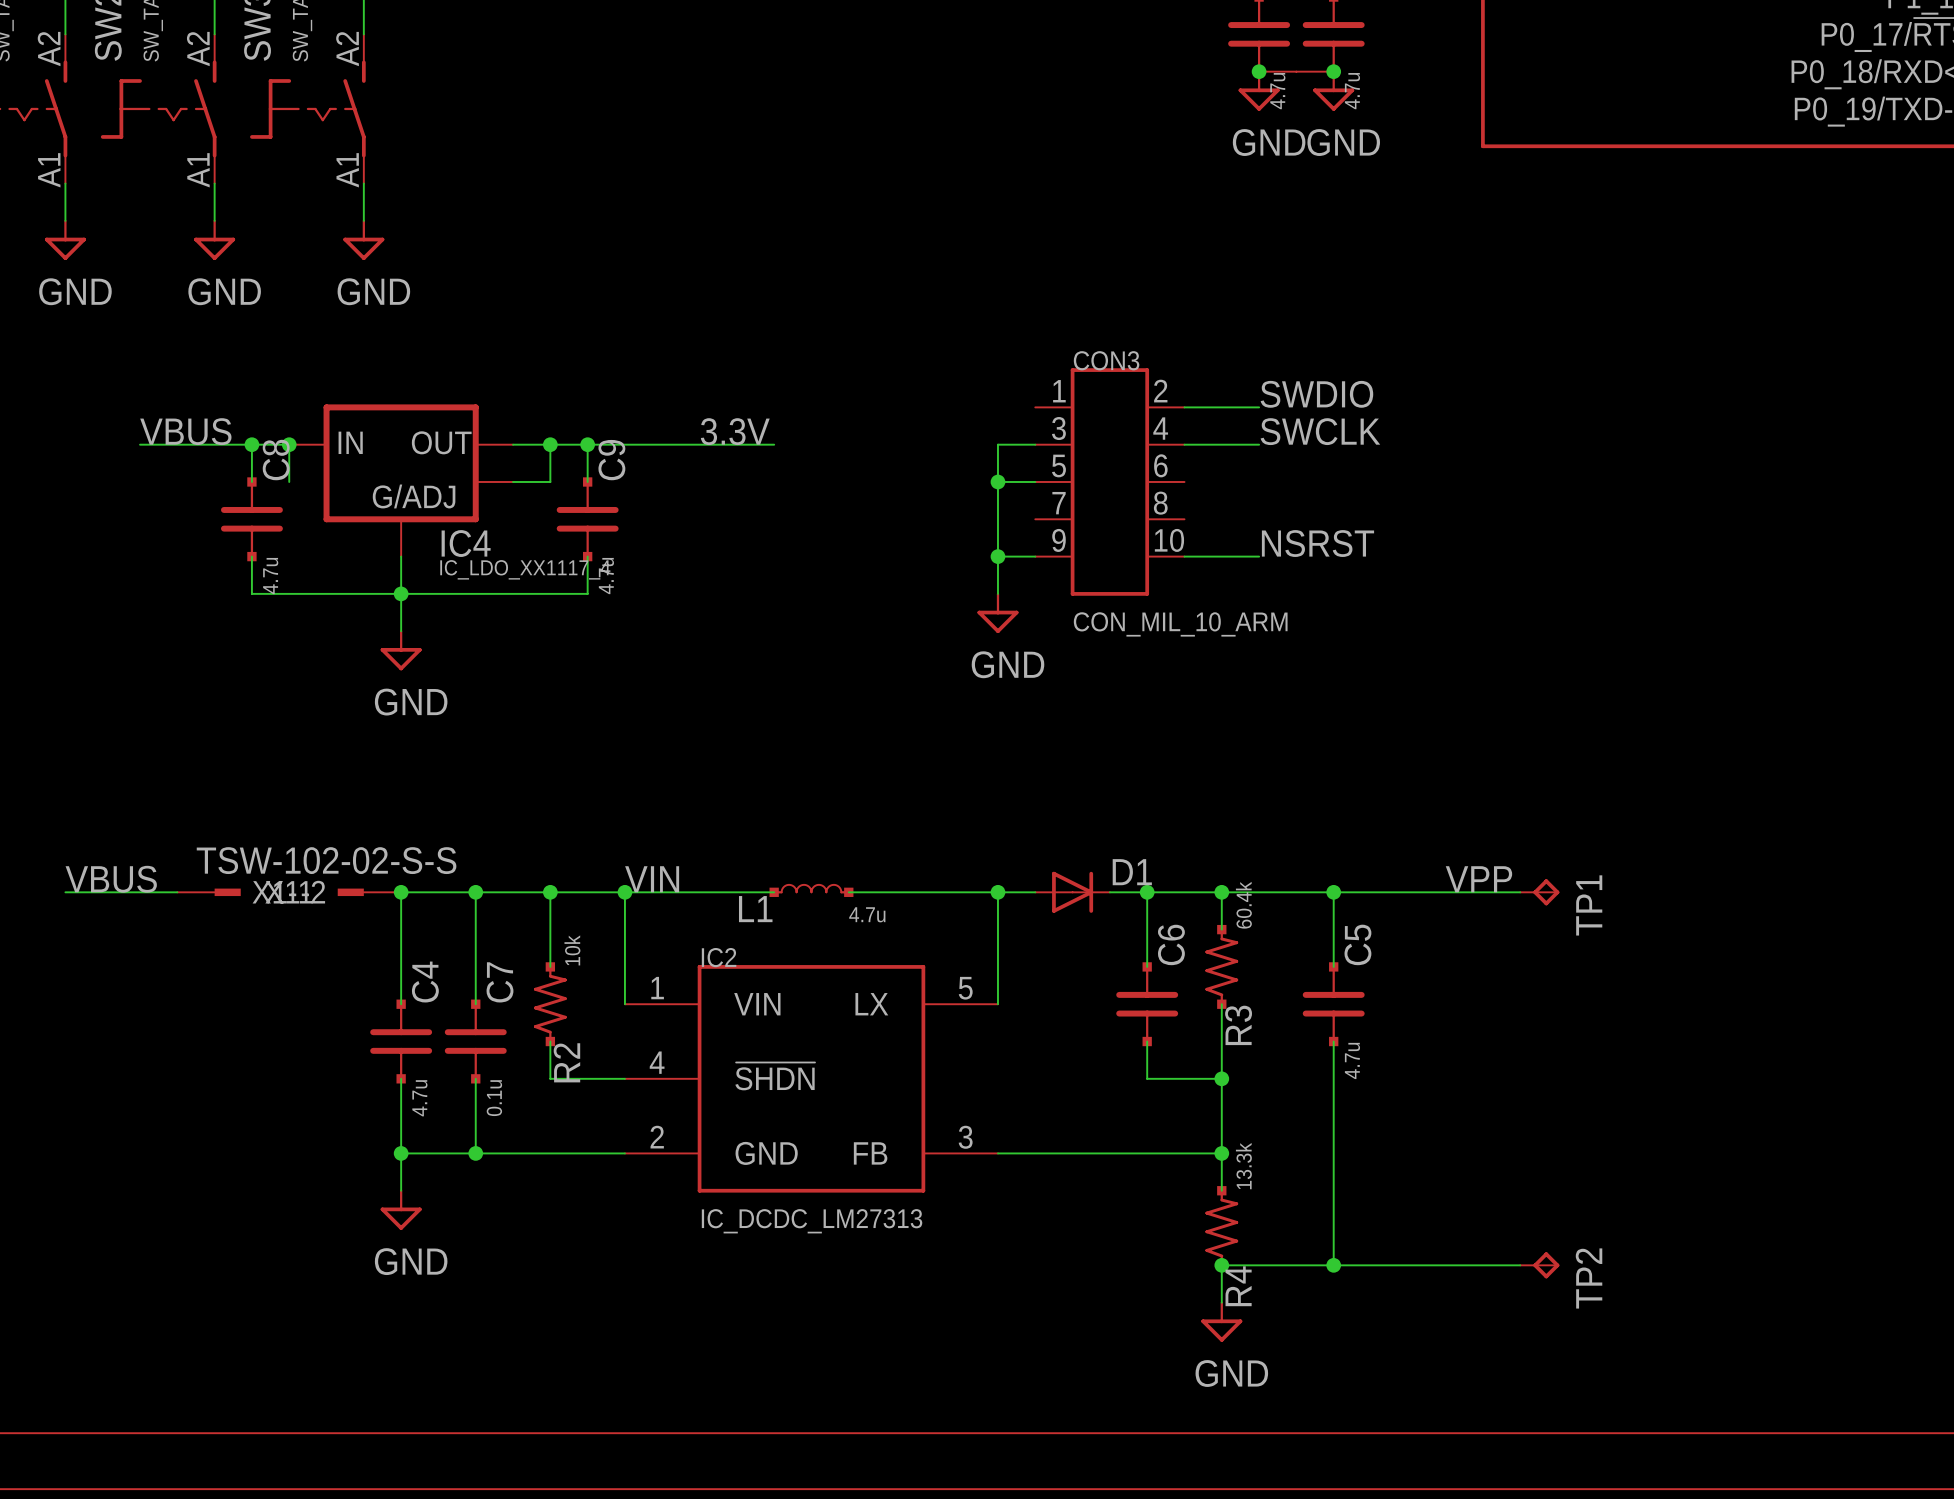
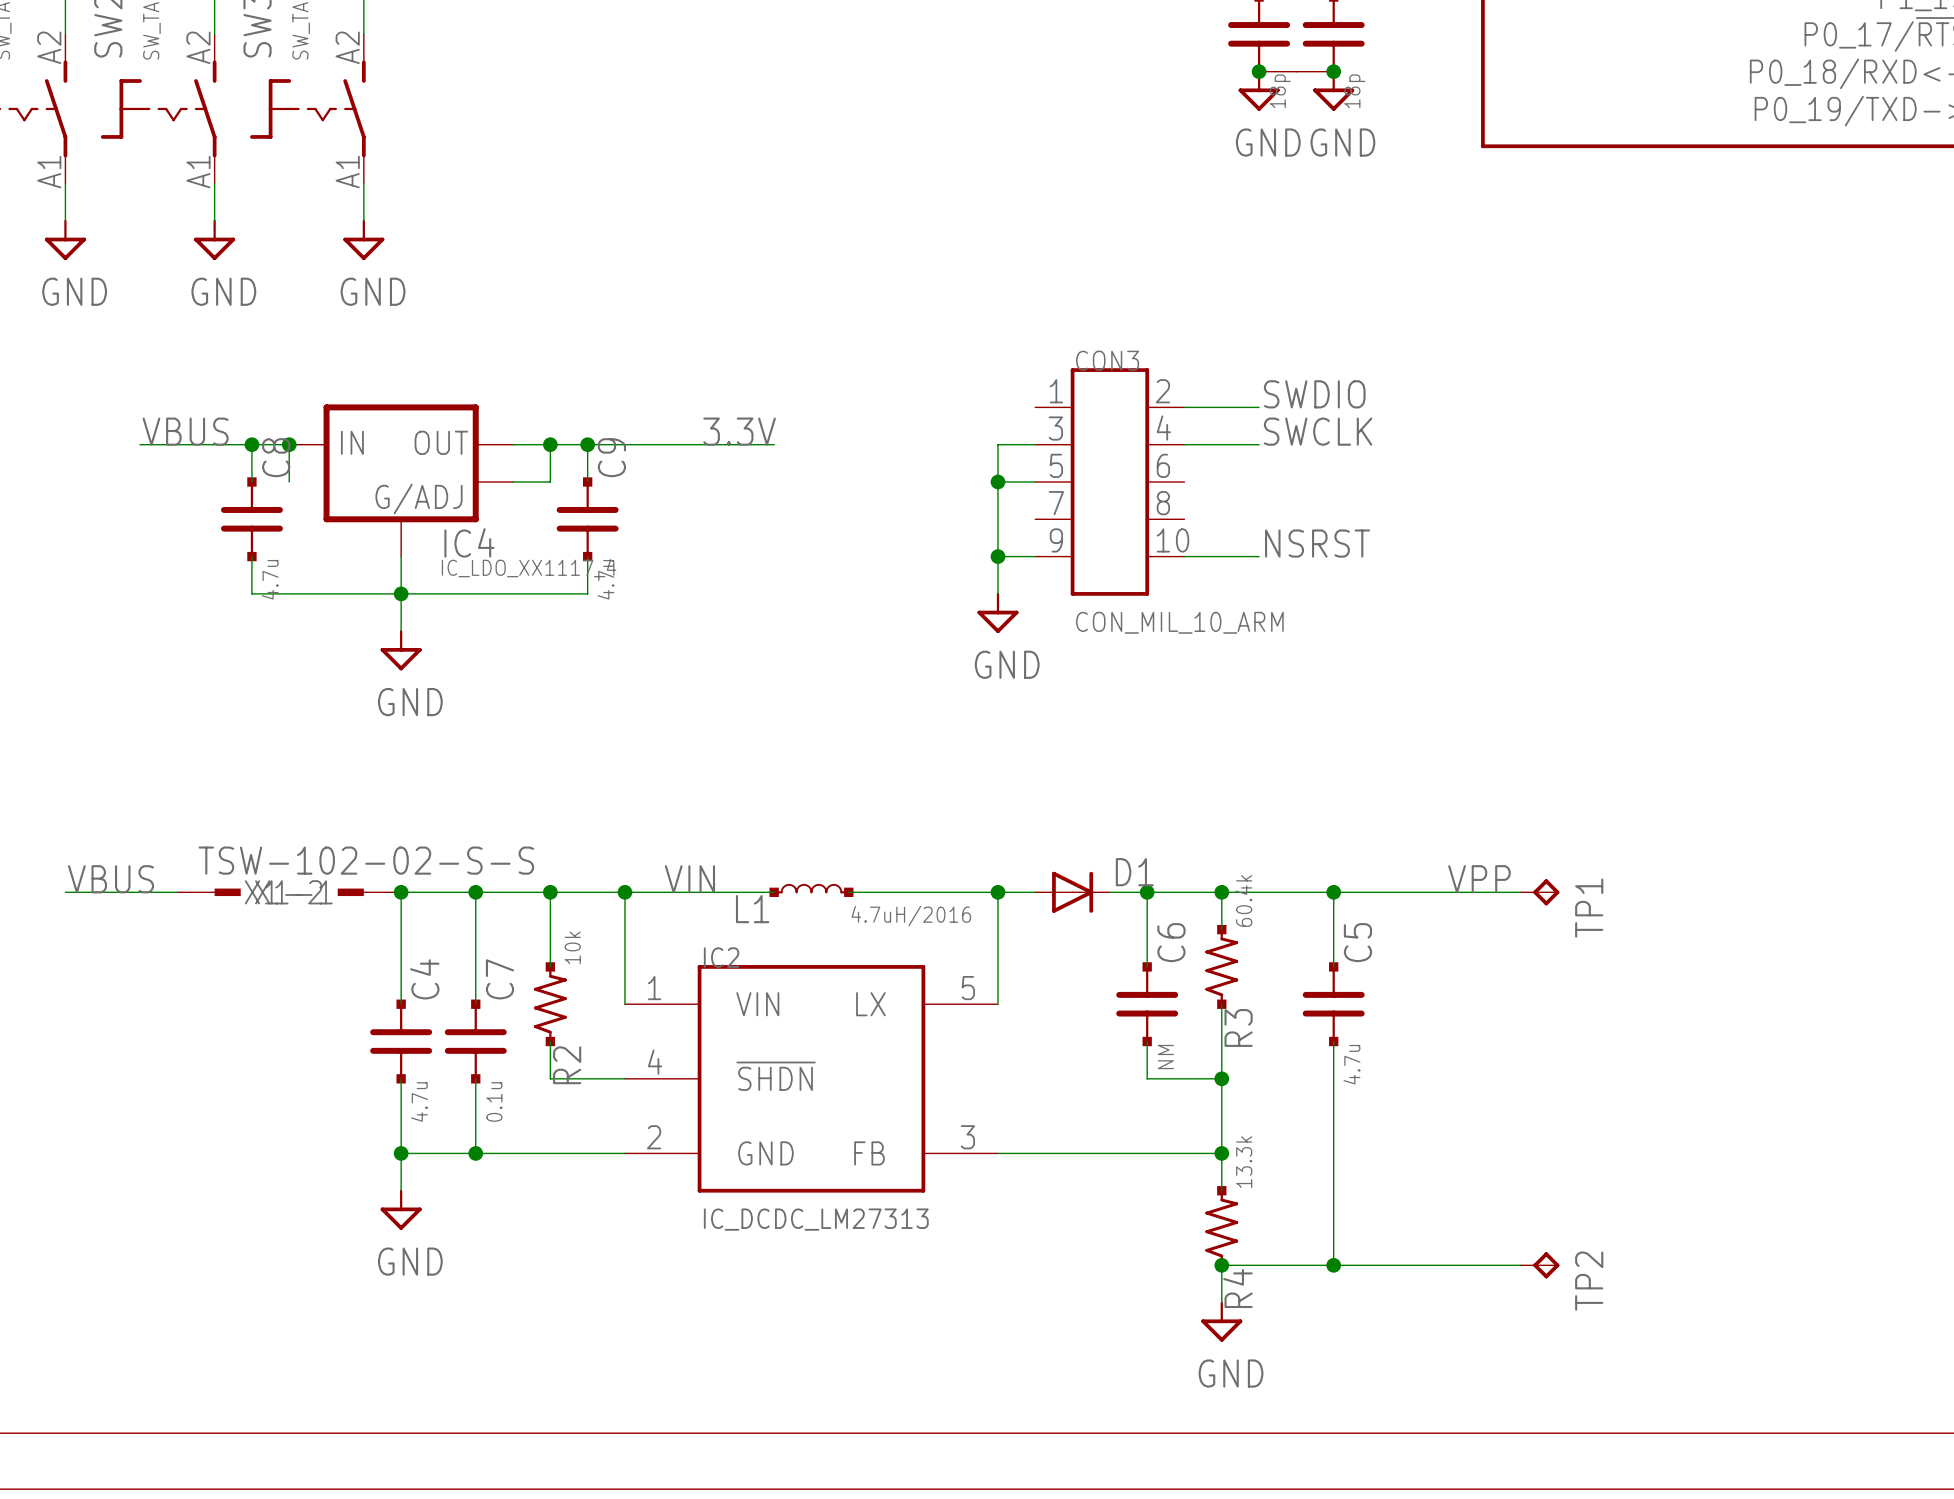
part value: 4.7u (1277, 91) -> 18p (1280, 91)
part value: 4.7u (1352, 91) -> 18p (1354, 91)
label position: VIN (652, 879) -> VIN (689, 879)
L1 value: 4.7u (867, 914) -> 4.7uH/2016 (911, 916)
C6 value: none -> NM (1165, 1057)

